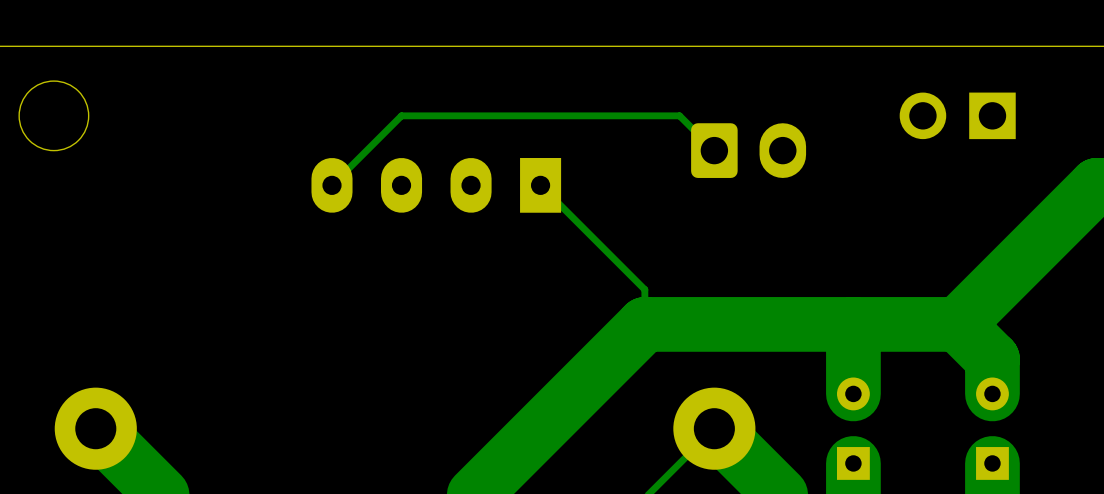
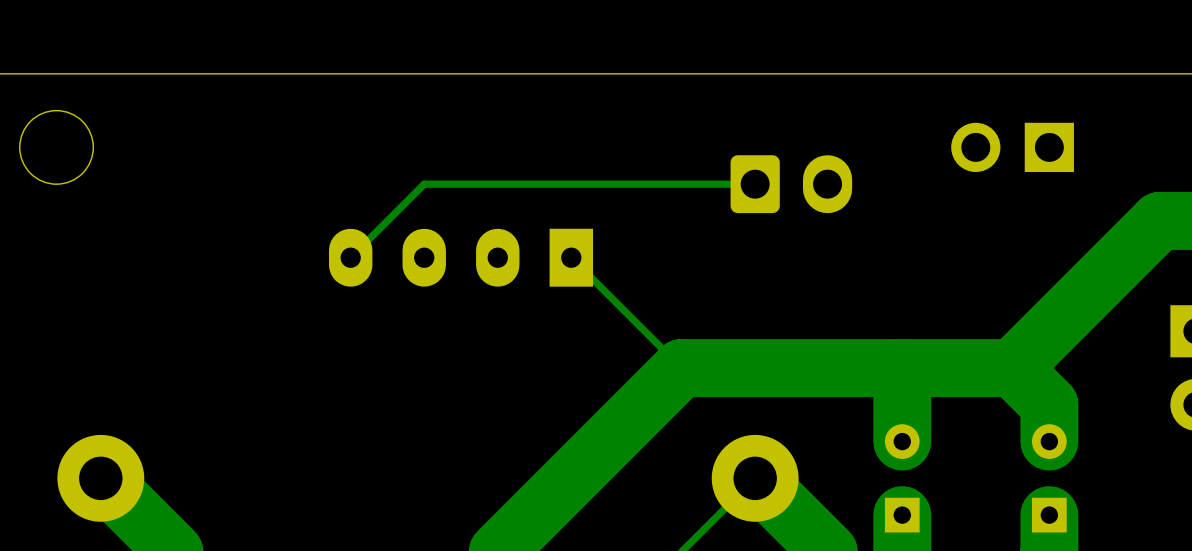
track: (714, 150) (679, 115) (401, 115) (332, 185) -> (755, 184) (424, 184) (350, 257)
part position: (436, 185) -> (461, 257)
track: (540, 185) (644, 289) (644, 324) -> (571, 257) (681, 368)

